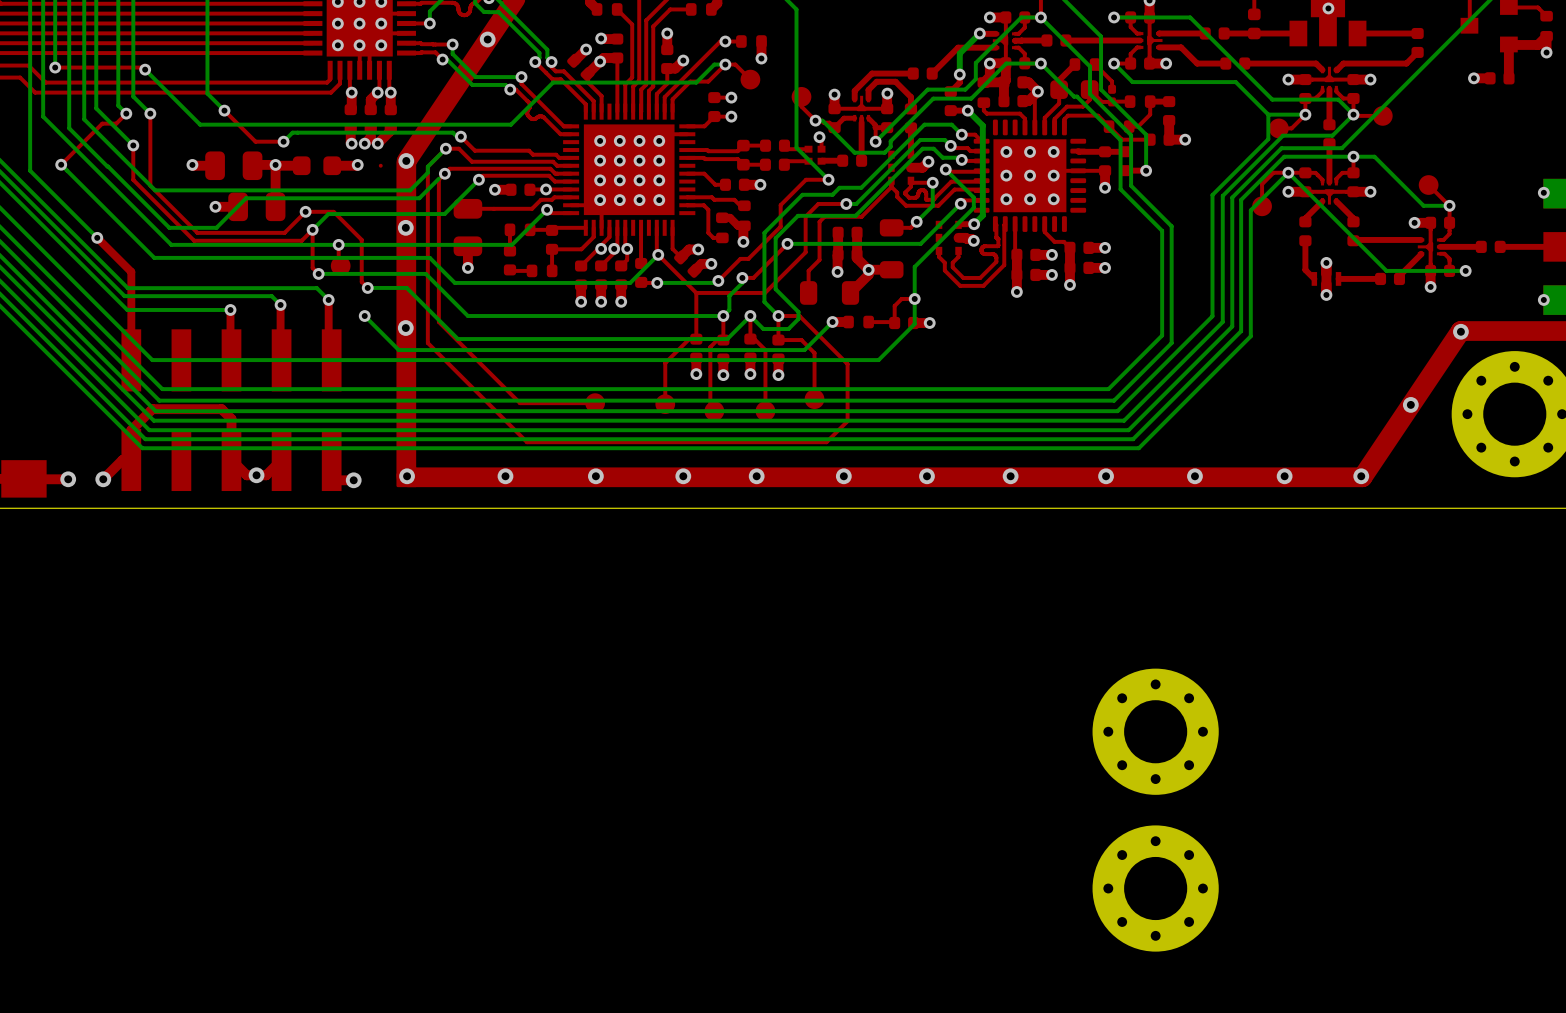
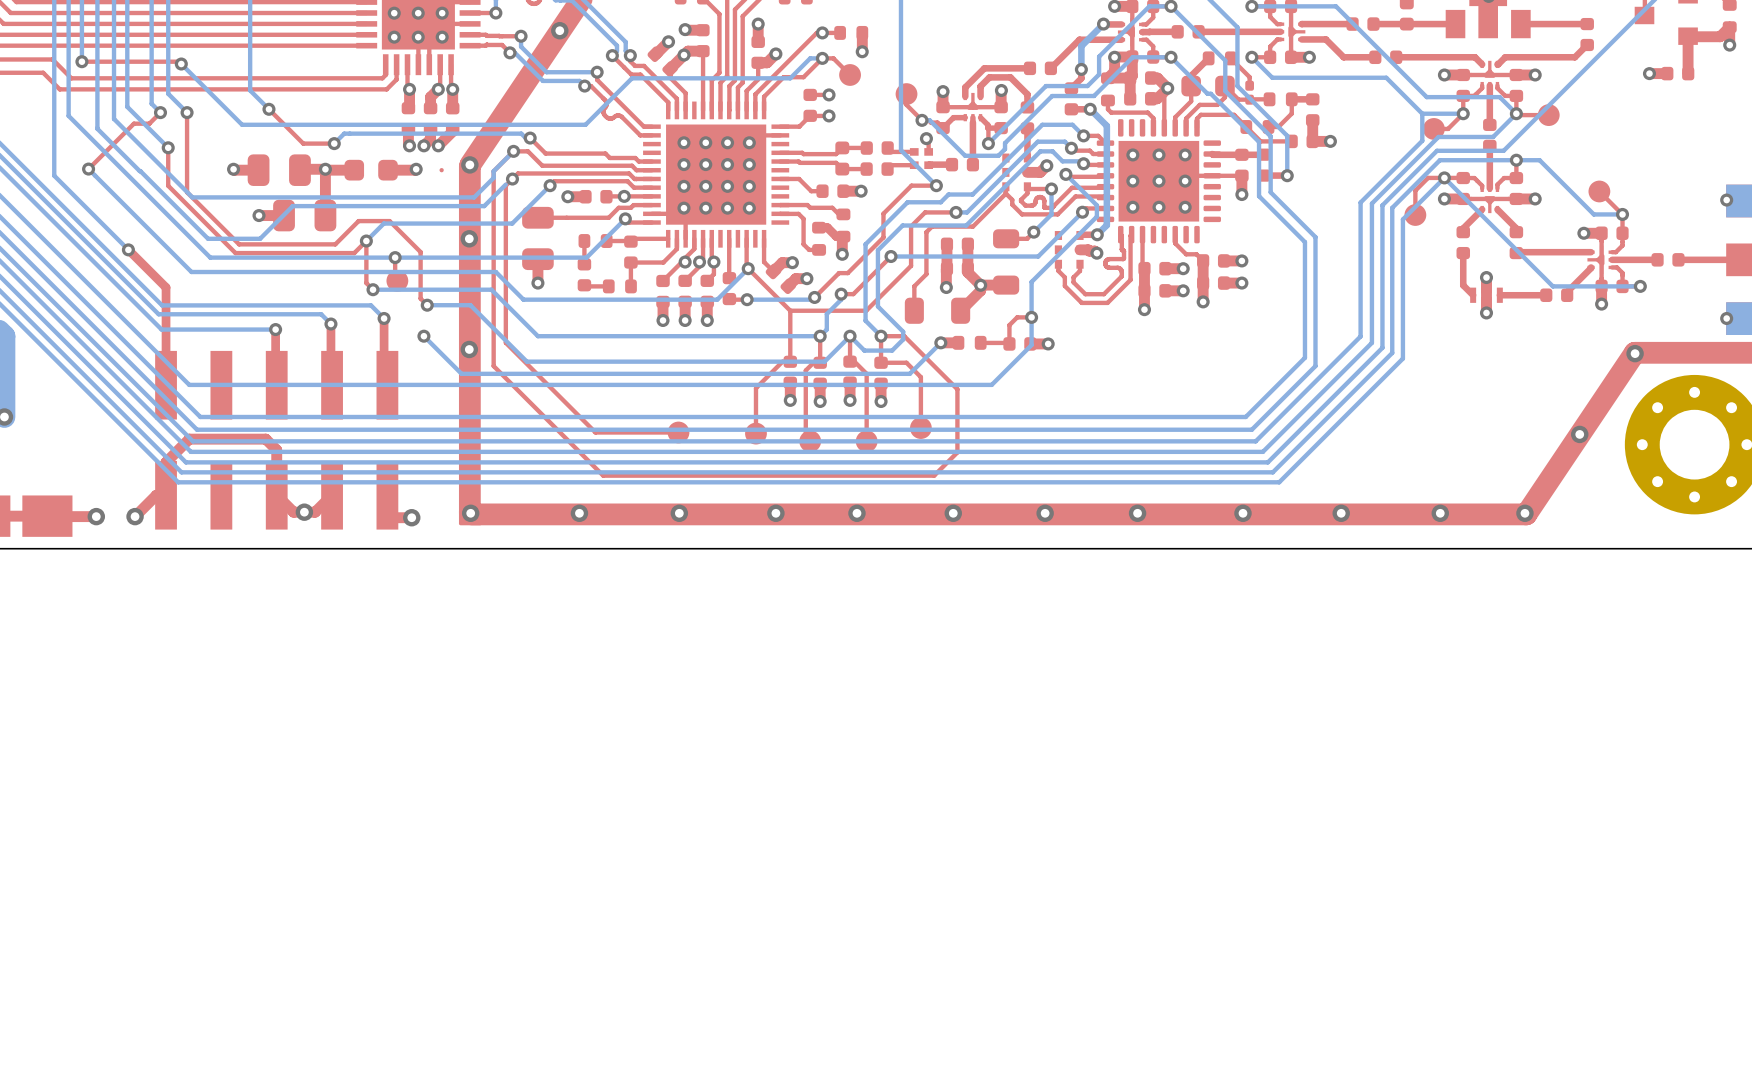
via: (305, 211) -> none
part: (1155, 731) -> none
part: (1155, 888) -> none

